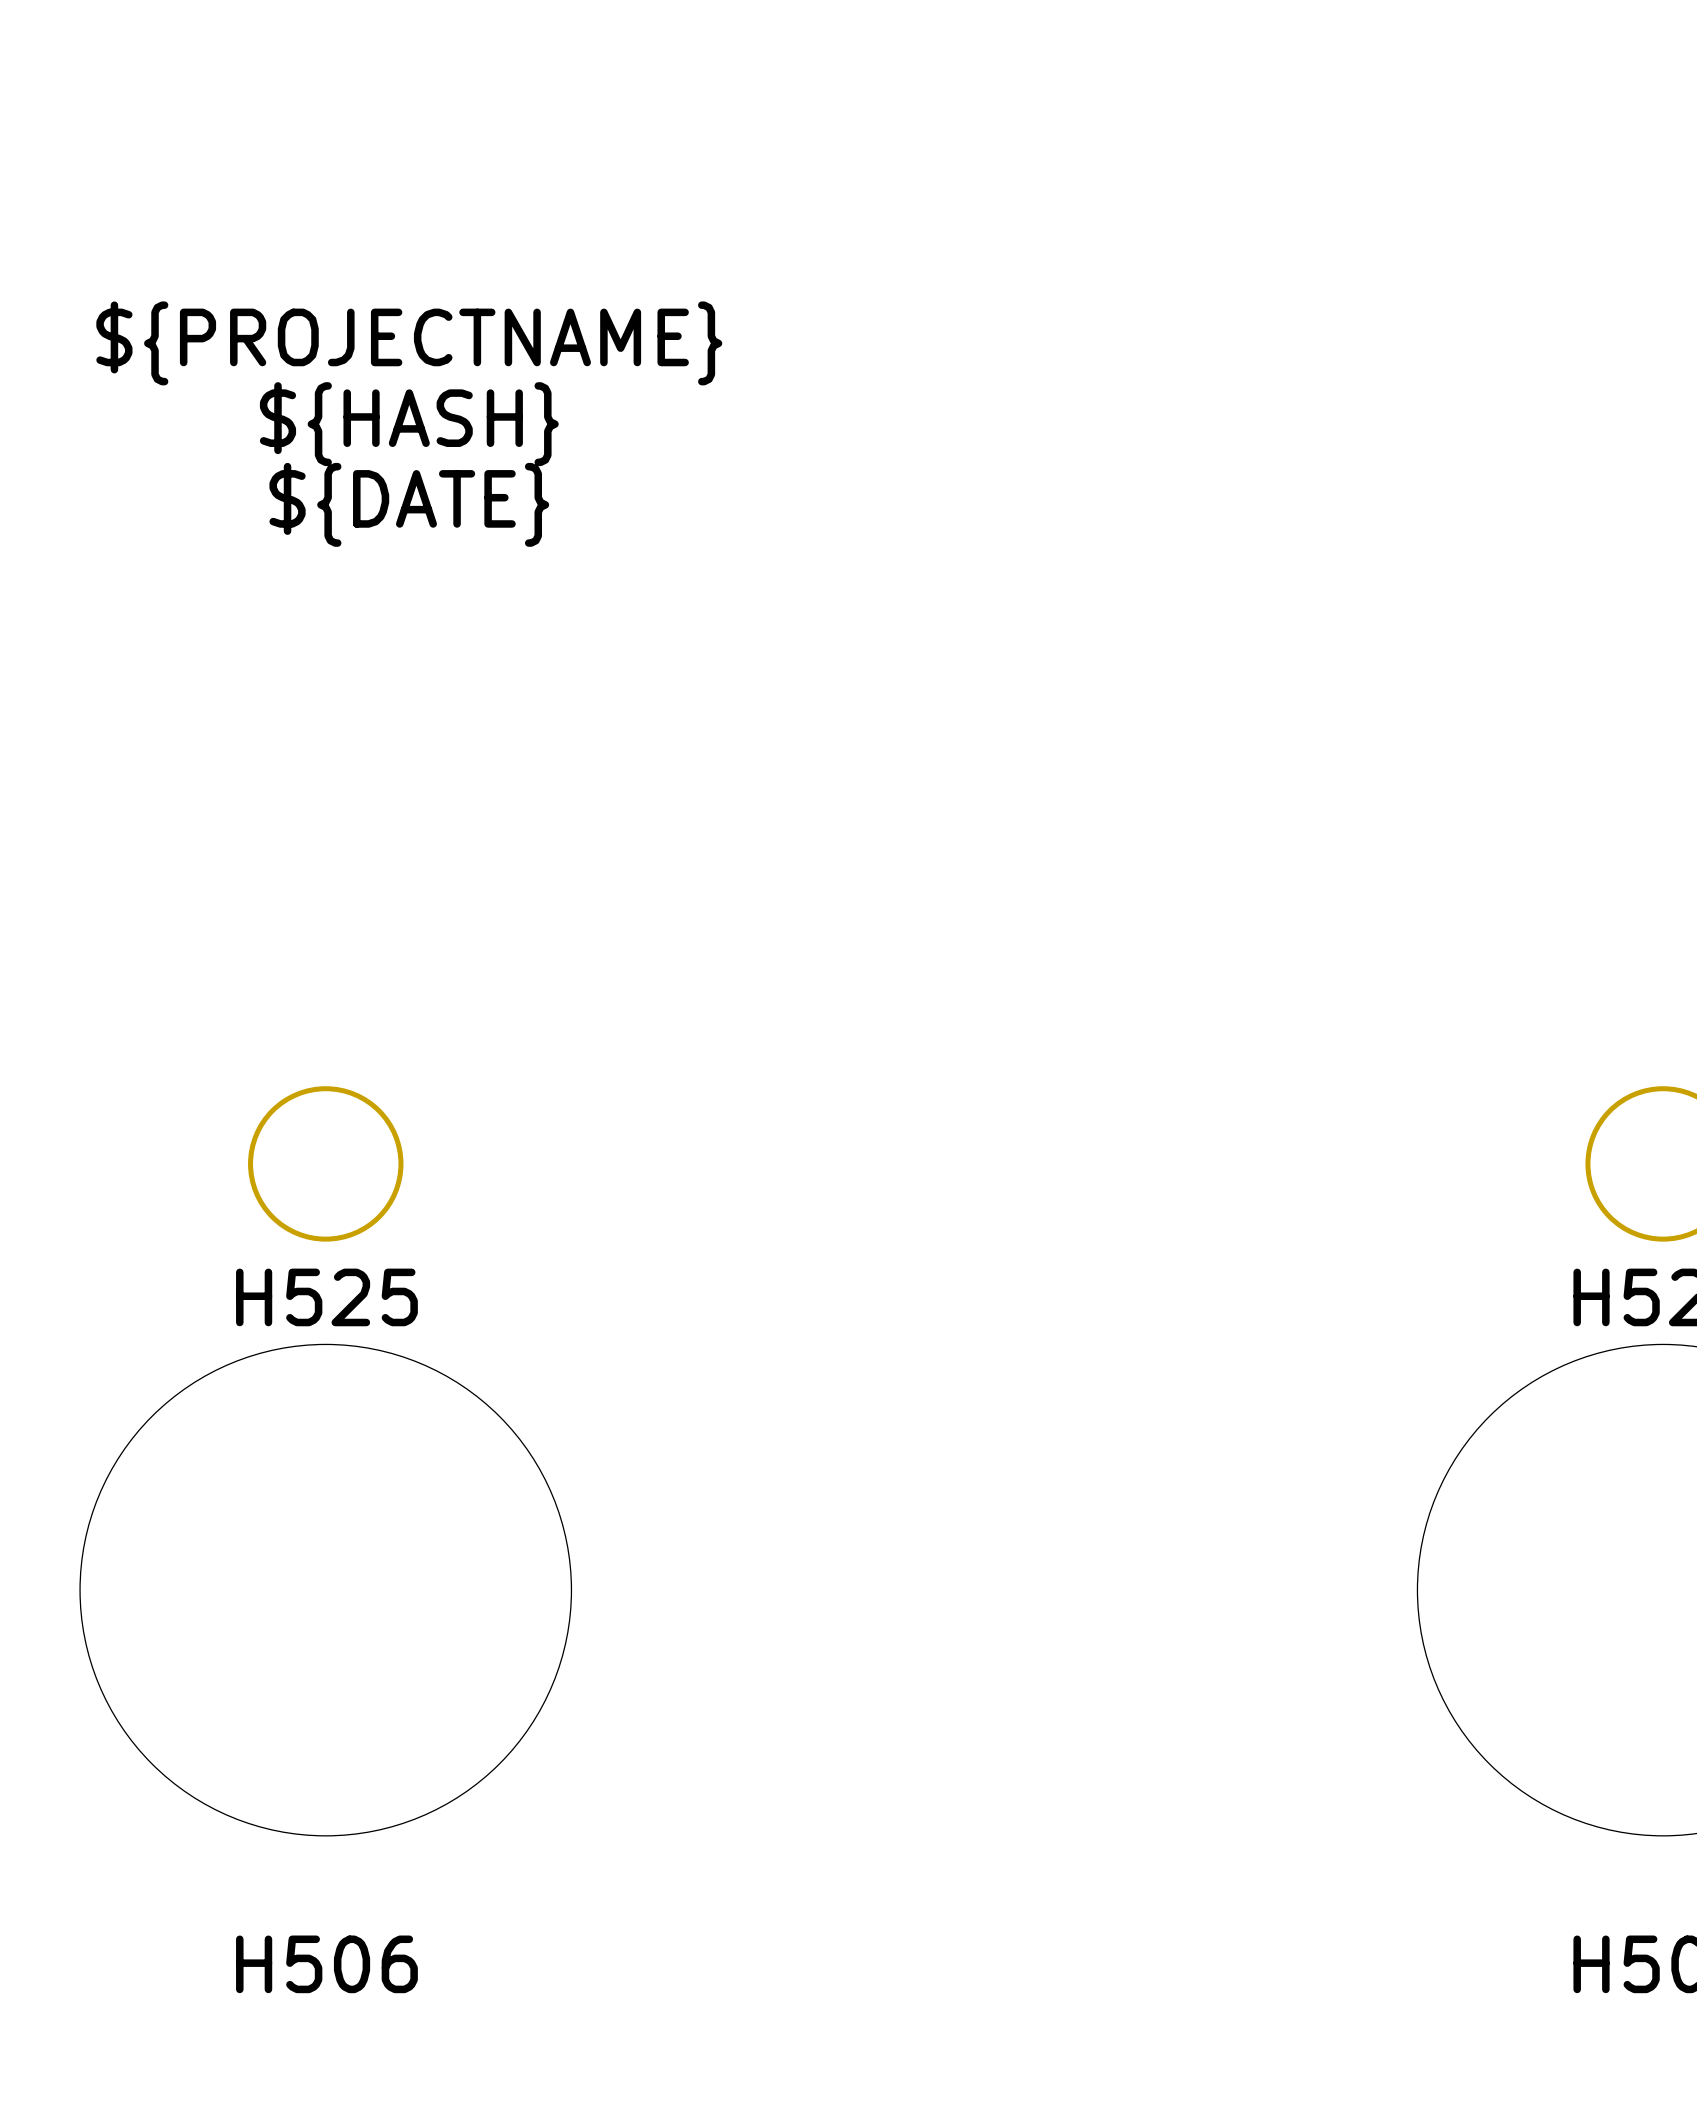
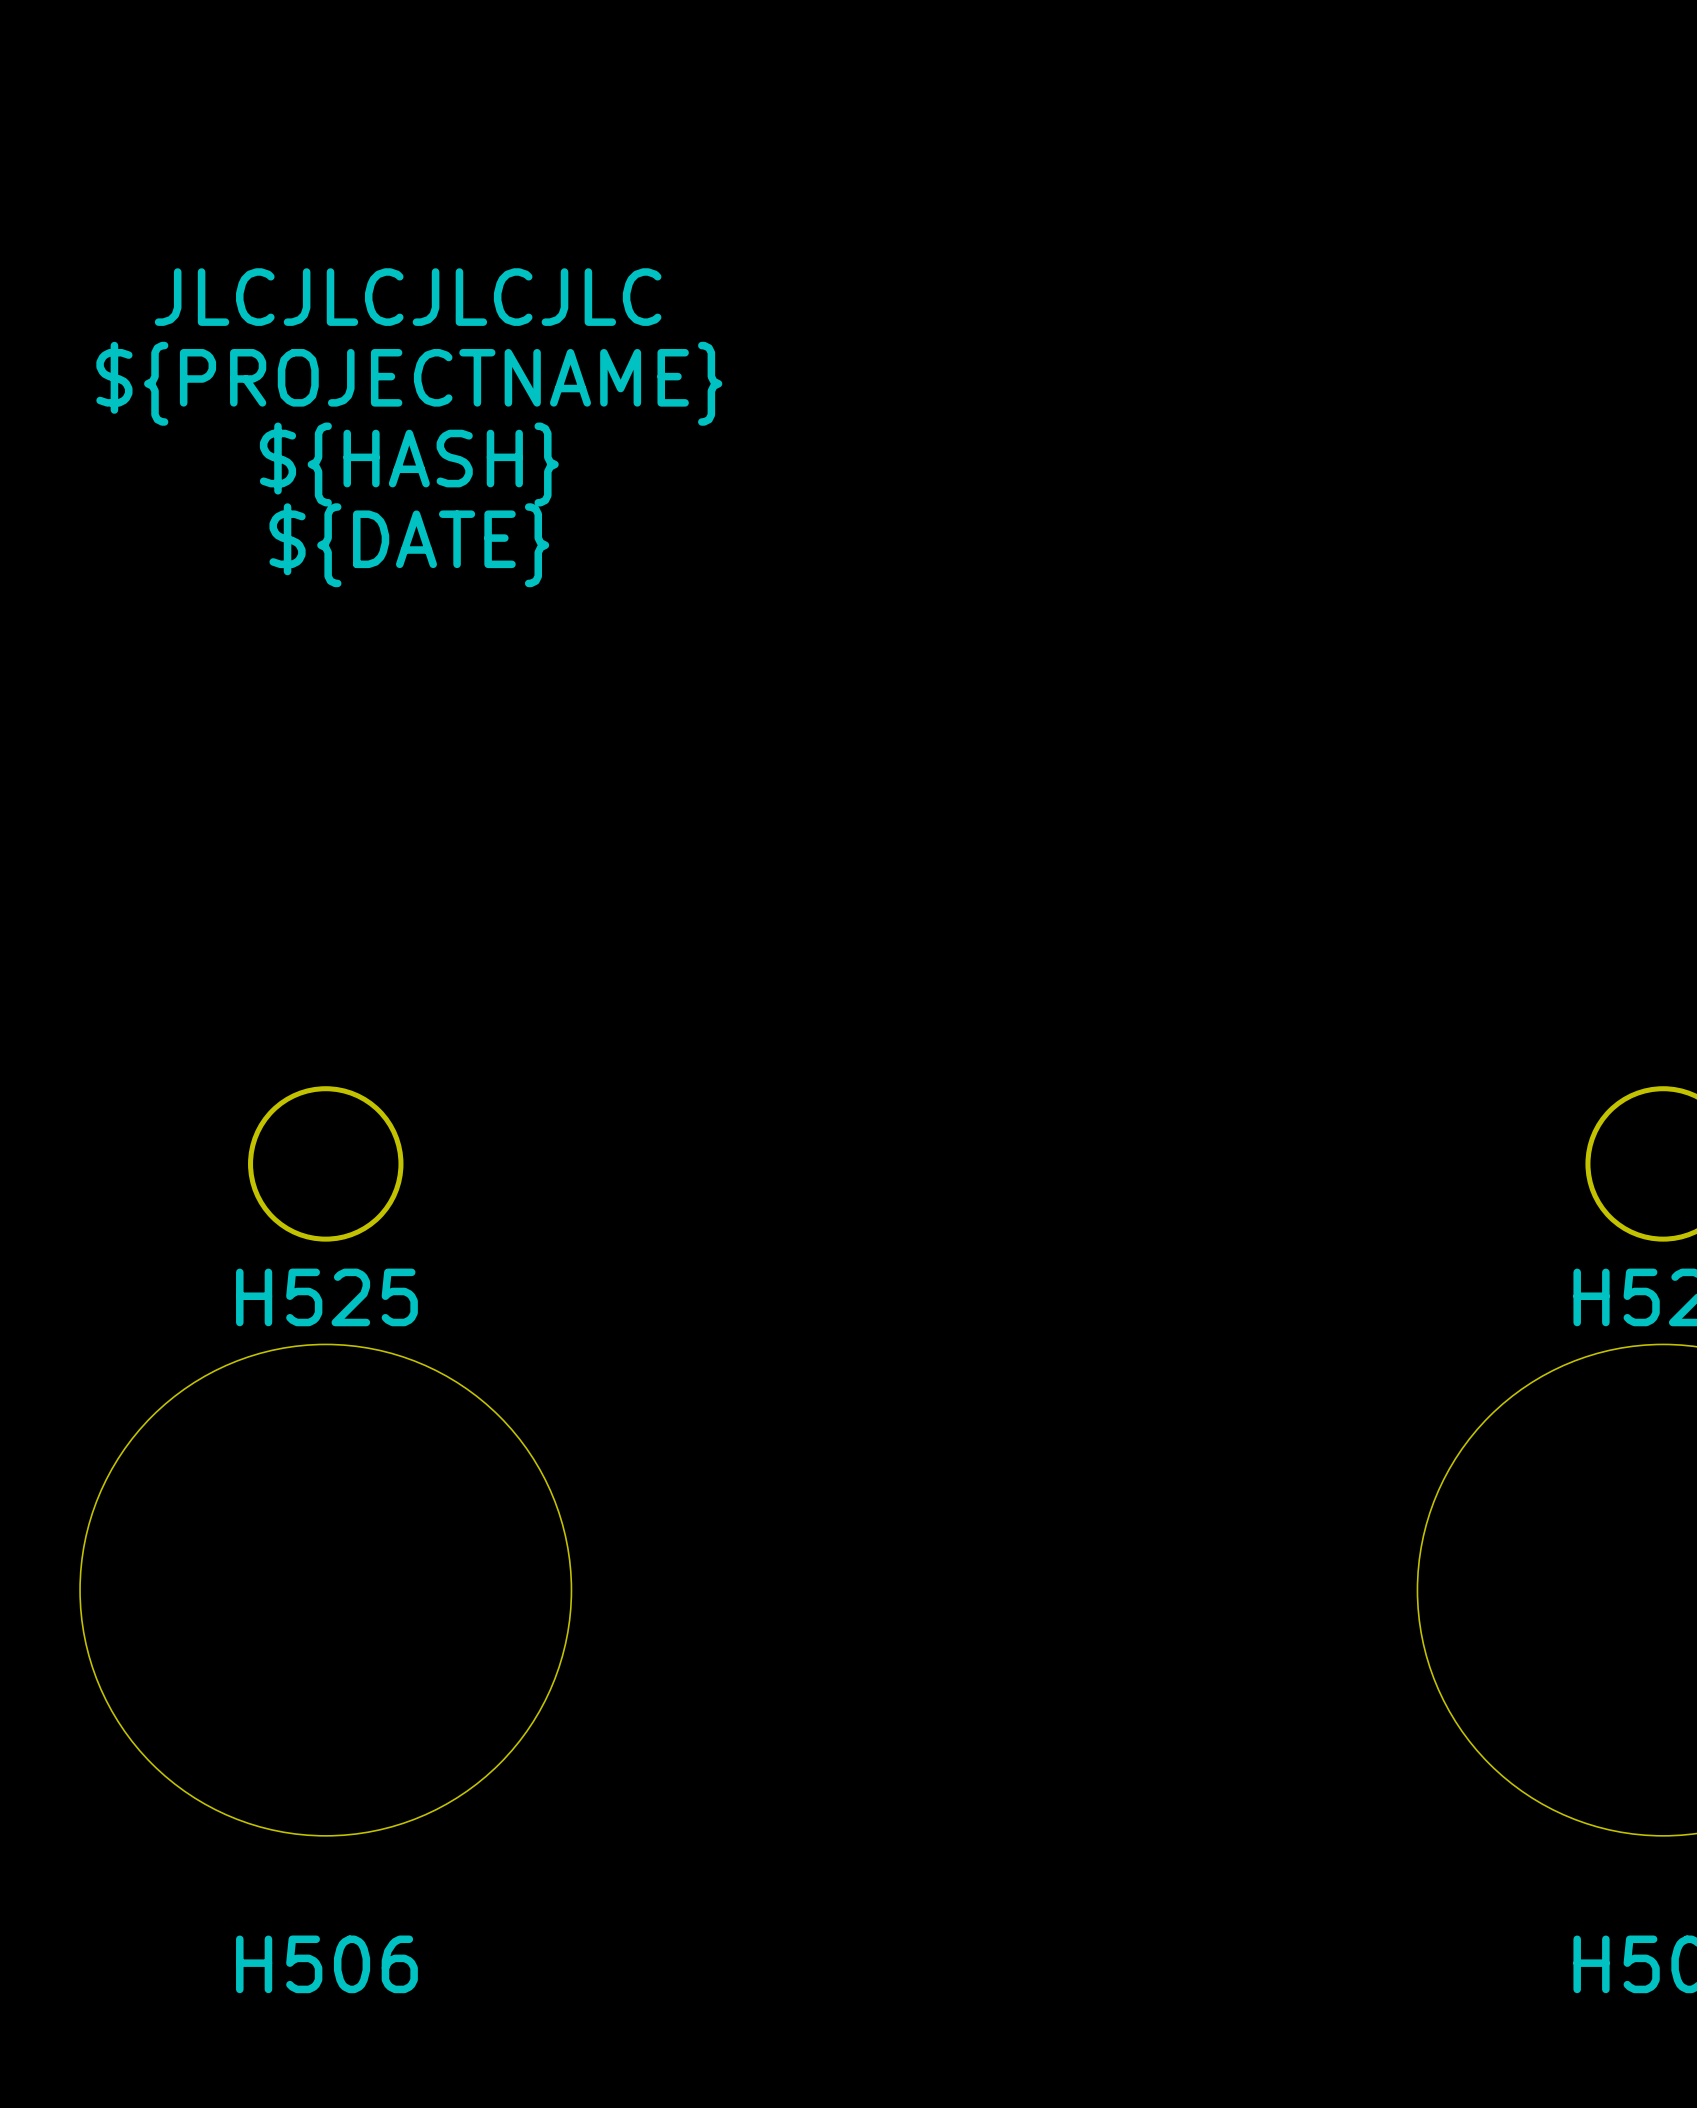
text: none -> JLCJLCJLCJLC (408, 297)
text position: ${PROJECTNAME} (409, 343) -> ${PROJECTNAME} (409, 383)
text position: ${HASH} (409, 424) -> ${HASH} (409, 464)
text position: ${DATE} (409, 504) -> ${DATE} (409, 545)

